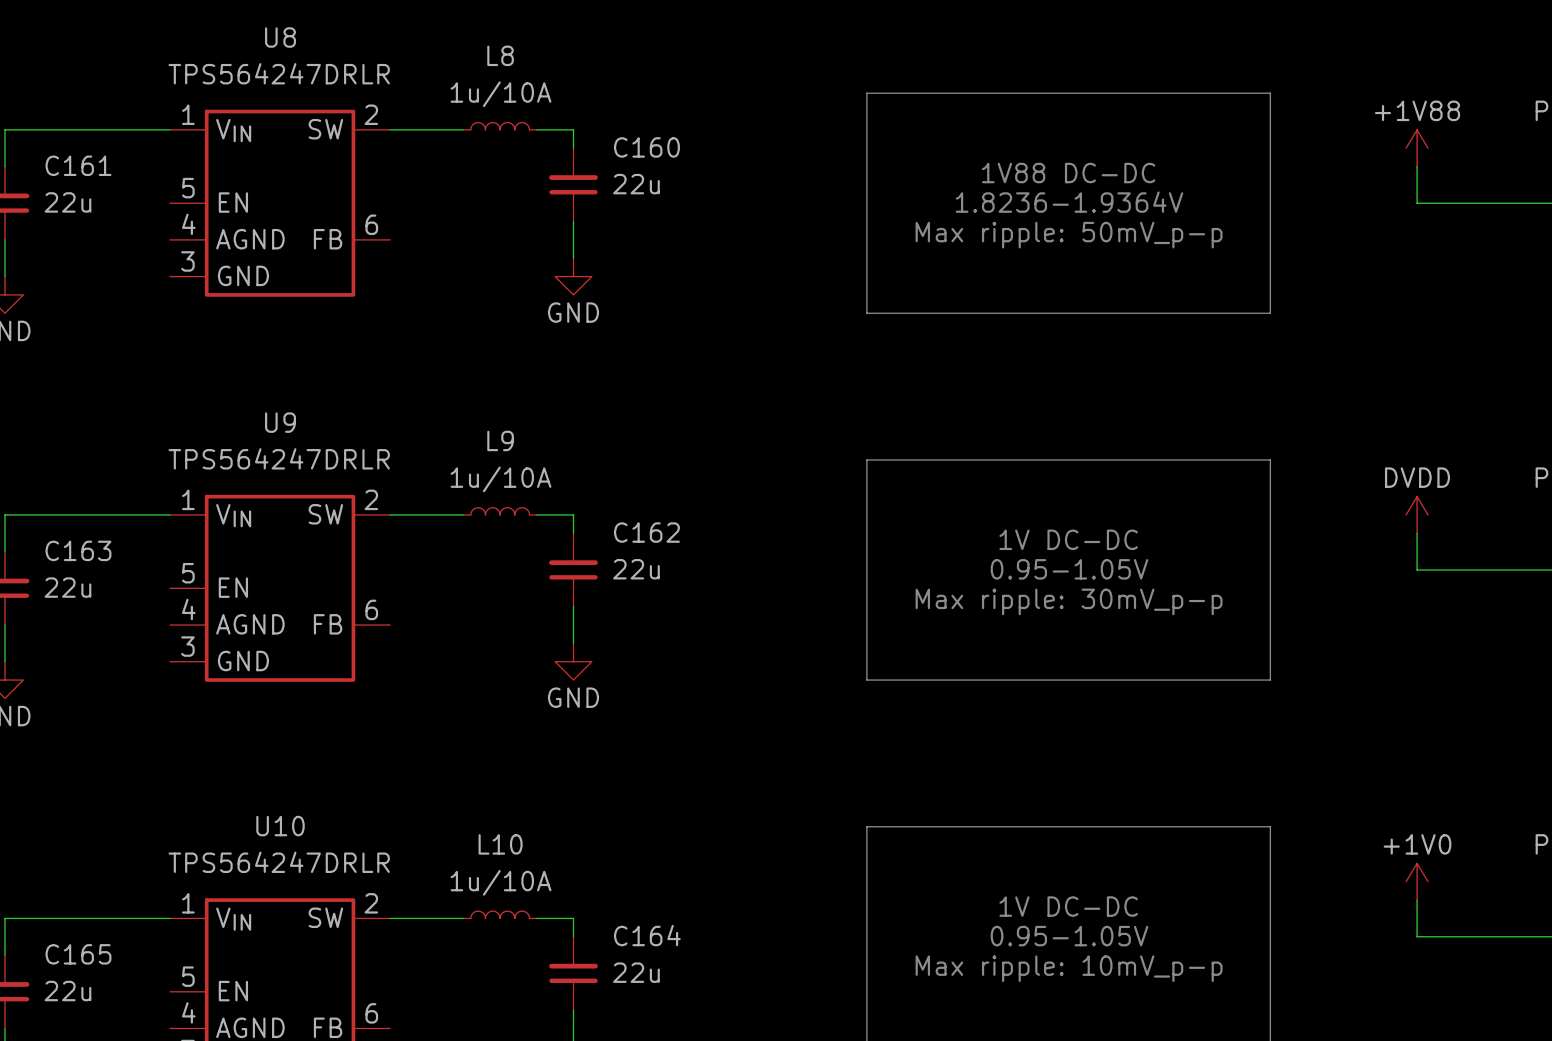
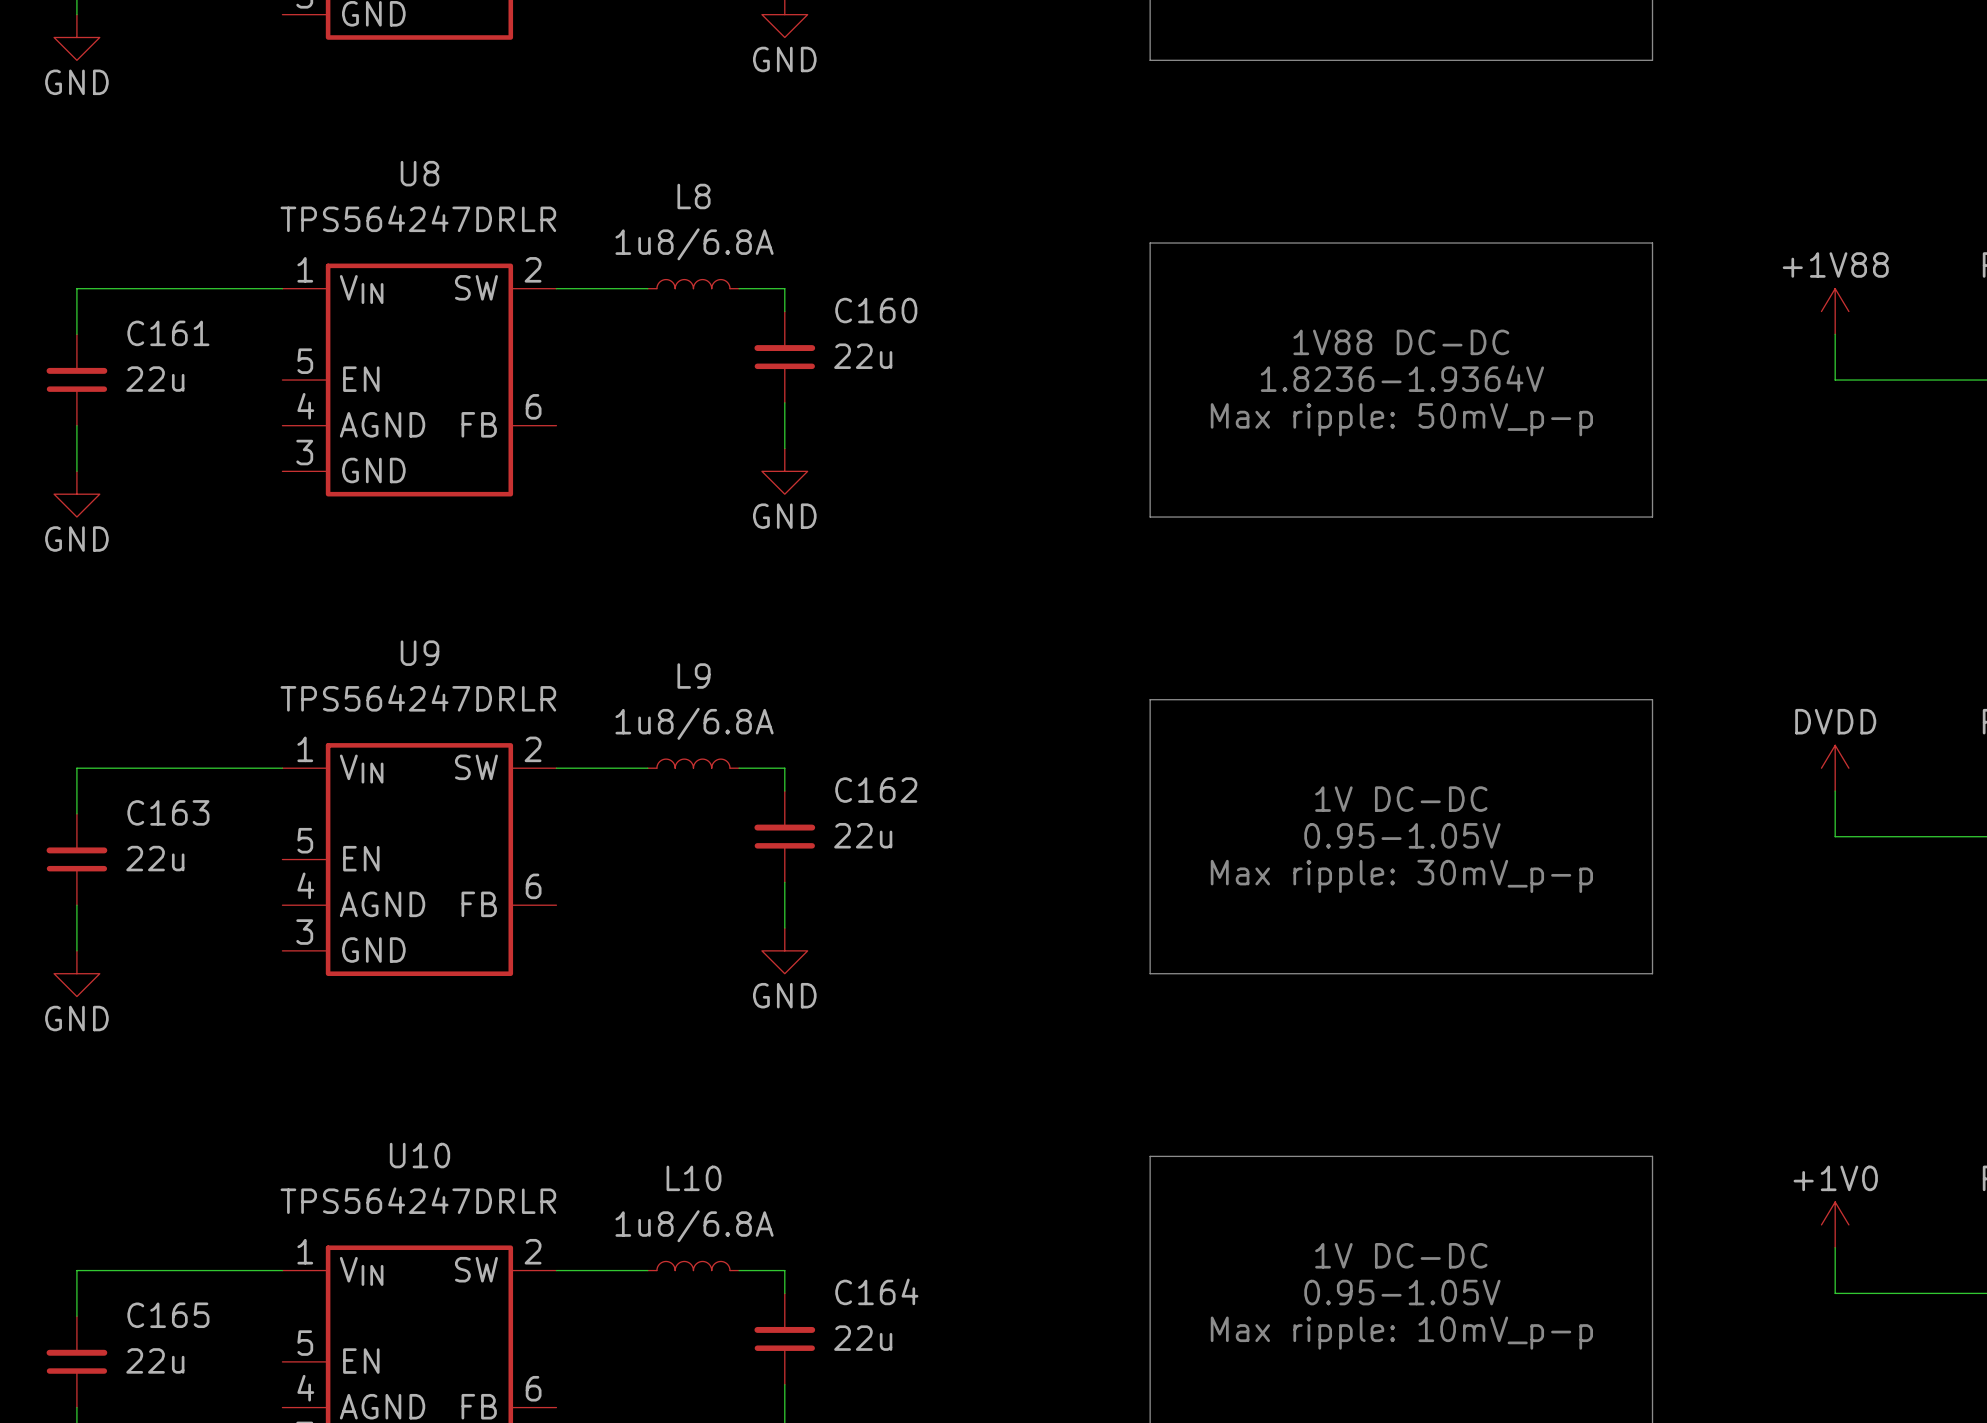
L8 text: 1u/10A (501, 94) -> 1u8/6.8A (694, 244)
L9 text: 1u/10A (501, 479) -> 1u8/6.8A (694, 723)
L10 text: 1u/10A (501, 882) -> 1u8/6.8A (694, 1226)

